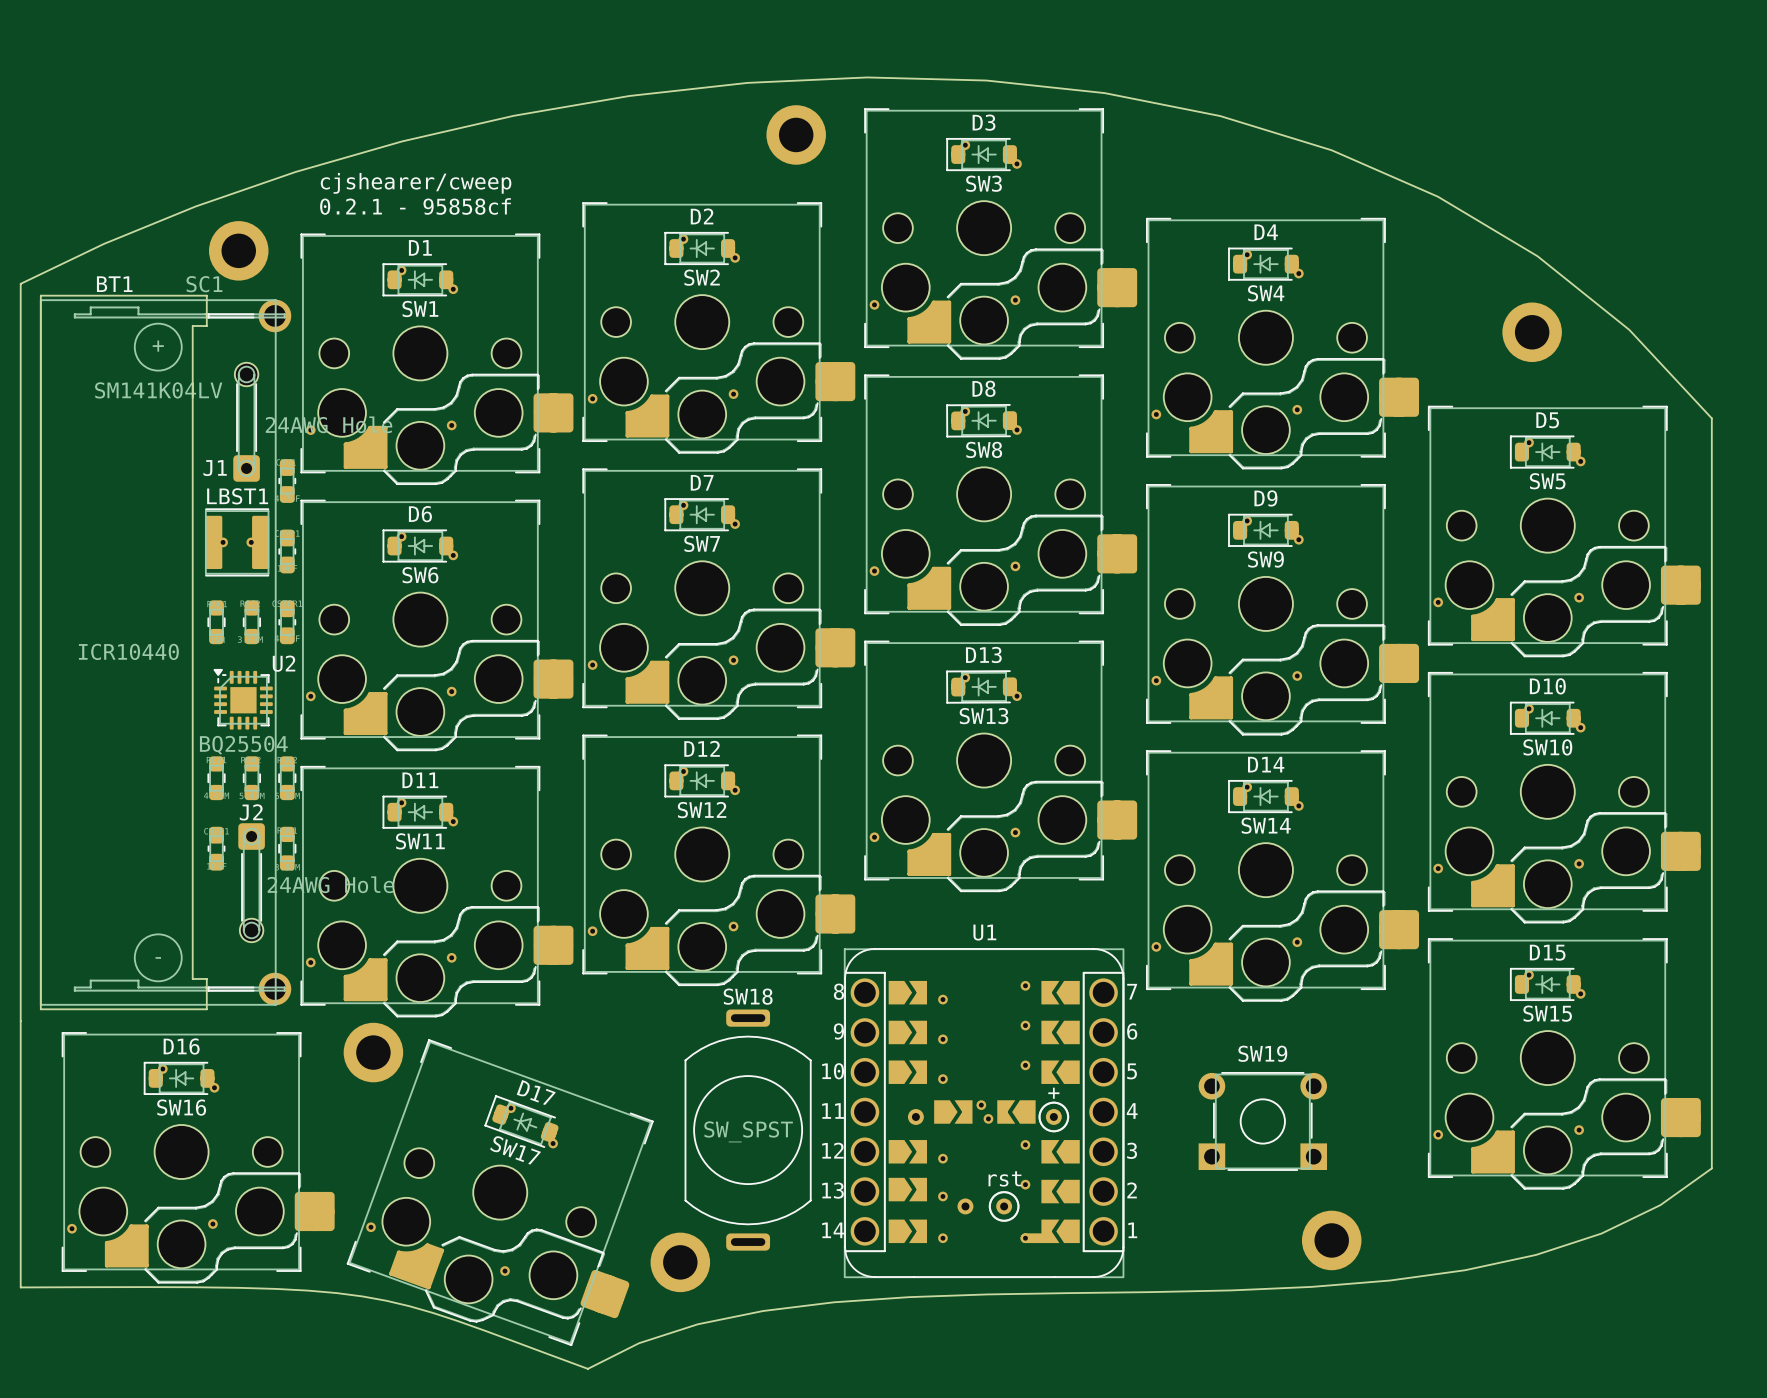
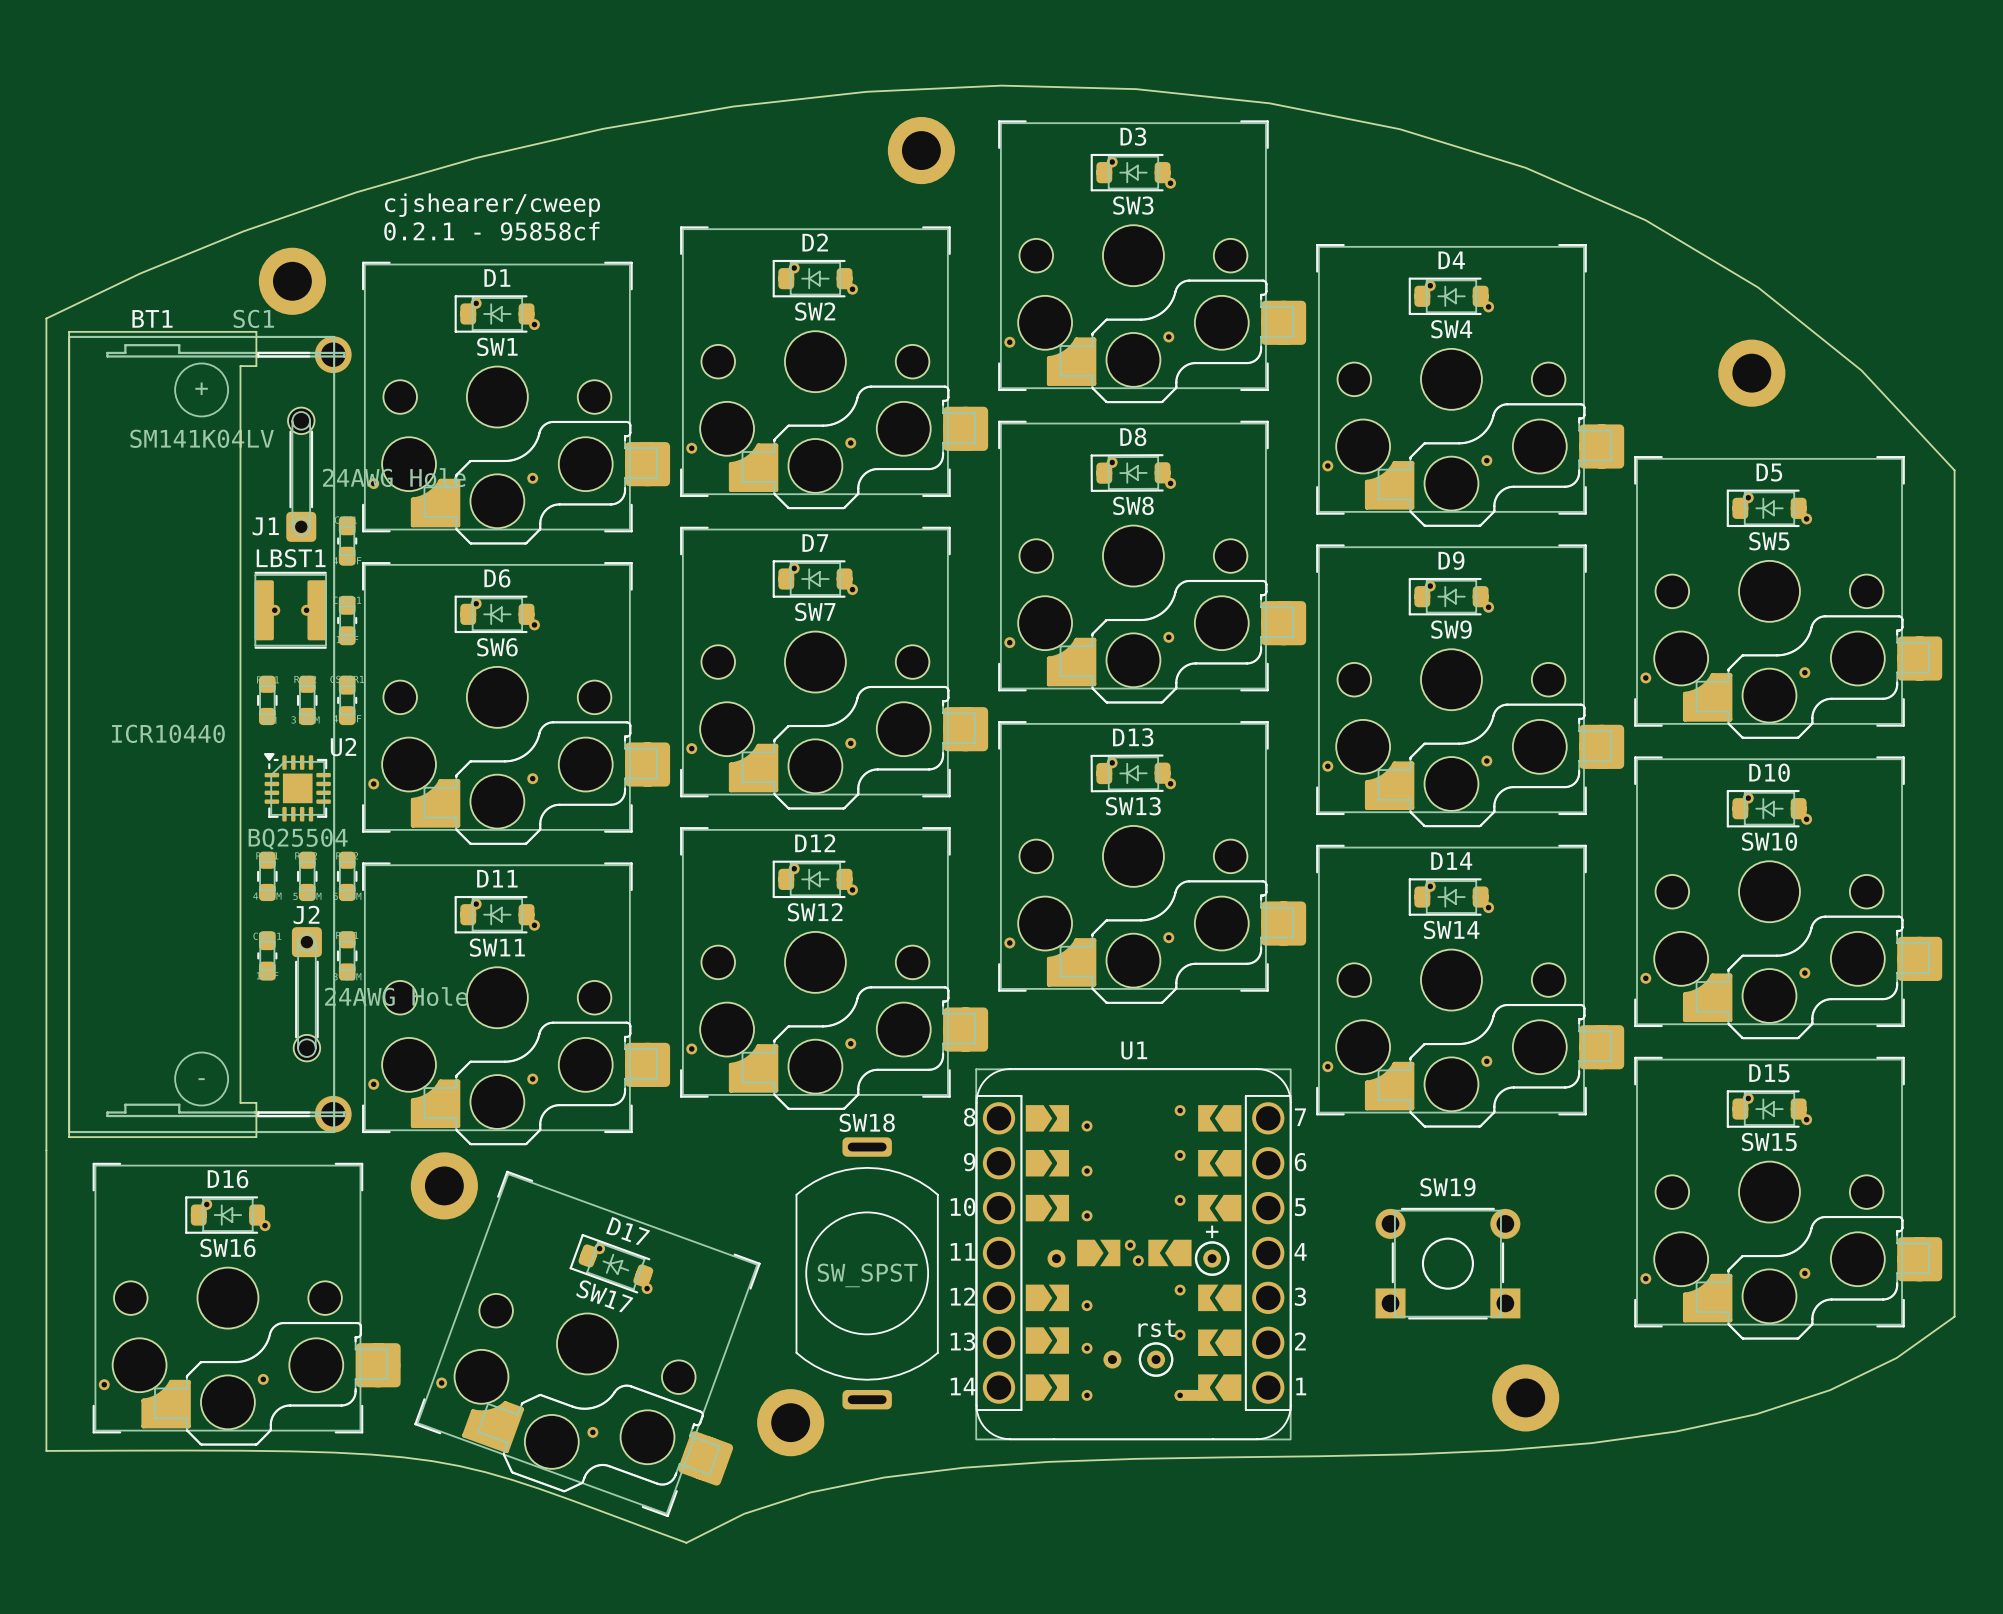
SW3 footprint: [864, 108, 1138, 360] -> [998, 120, 1307, 404]
SW2 footprint: [582, 202, 856, 454] -> [680, 226, 989, 510]
SW4 footprint: [1146, 217, 1420, 470] -> [1316, 244, 1625, 527]
SW1 footprint: [300, 233, 574, 486] -> [362, 261, 671, 545]
SW8 footprint: [864, 374, 1138, 626] -> [998, 420, 1307, 704]
SW5 footprint: [1427, 405, 1701, 658] -> [1634, 456, 1943, 739]
SW7 footprint: [582, 468, 856, 720] -> [680, 526, 989, 810]
SW9 footprint: [1146, 484, 1420, 736] -> [1316, 544, 1625, 828]
SW6 footprint: [300, 499, 574, 752] -> [362, 562, 671, 845]
SW13 footprint: [864, 640, 1138, 893] -> [998, 721, 1307, 1004]
SW10 footprint: [1427, 671, 1701, 924] -> [1634, 756, 1943, 1040]
SW12 footprint: [582, 734, 856, 987] -> [680, 827, 989, 1110]
SW14 footprint: [1146, 750, 1420, 1002] -> [1316, 844, 1625, 1128]
SW11 footprint: [300, 765, 574, 1018] -> [362, 862, 671, 1146]
SW15 footprint: [1427, 938, 1701, 1190] -> [1634, 1056, 1943, 1340]
SW16 footprint: [61, 1032, 335, 1284] -> [92, 1162, 401, 1446]
SW17 footprint: [346, 1039, 654, 1347] -> [414, 1170, 761, 1518]

